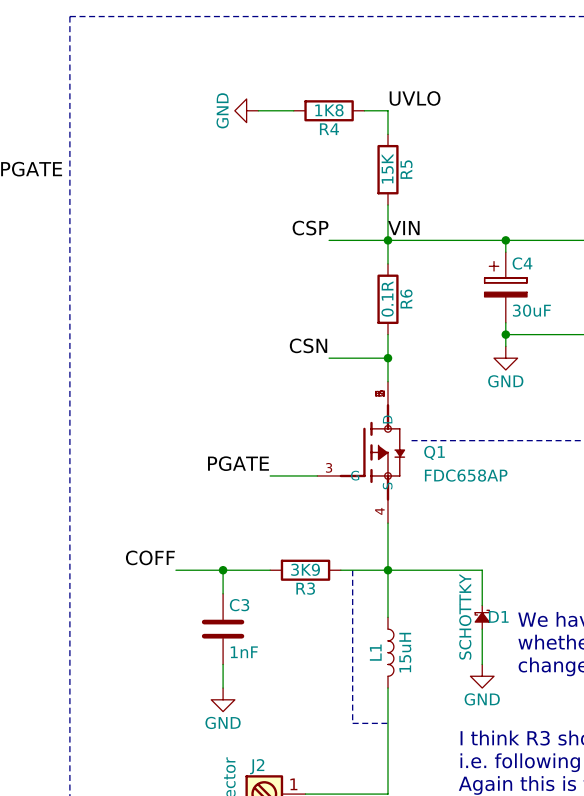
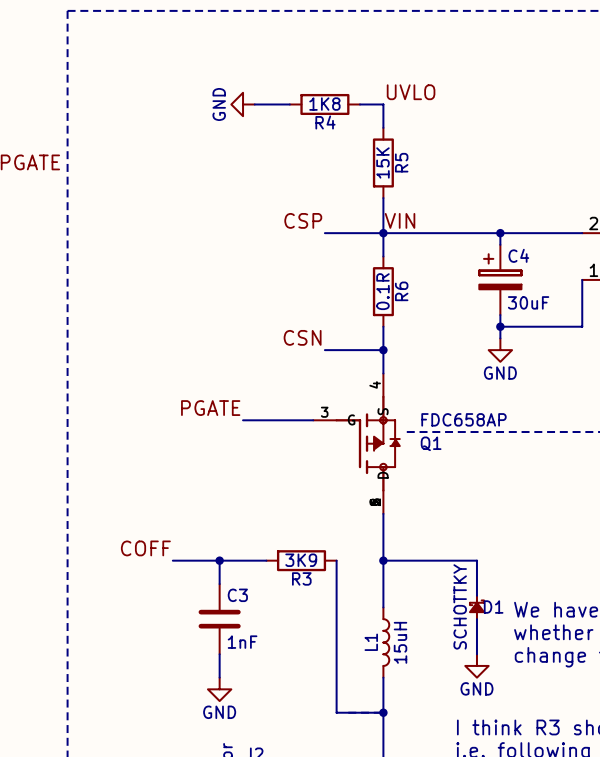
wire: none -> (243, 420) (313, 420)
Q1 flip: as is (372, 452) -> up-down (367, 443)
label position: PGATE (238, 463) -> PGATE (210, 408)
wire: (270, 475) (317, 475) -> none
wire: (340, 570) (387, 570) -> (336, 560) (336, 712) (383, 712)
line: (352, 570) (352, 723) -> none
junction: none -> (383, 712)

